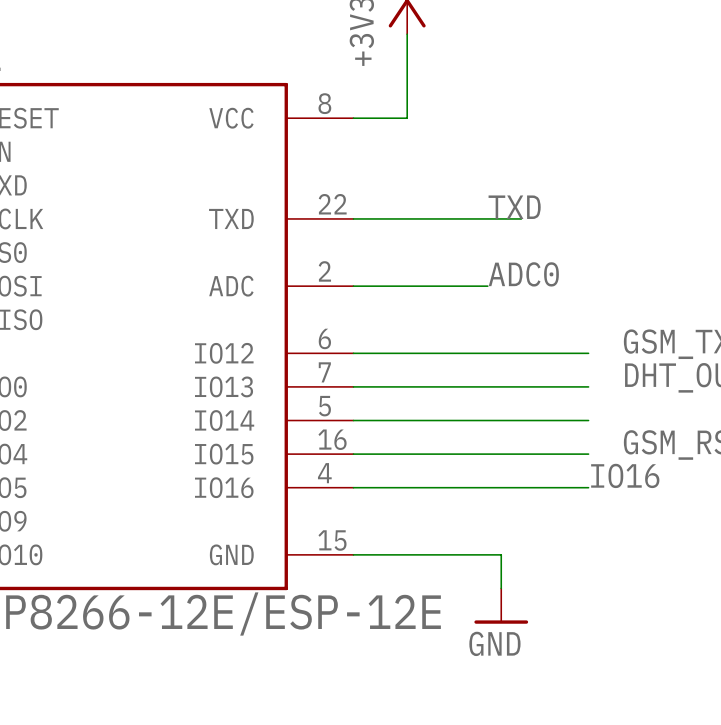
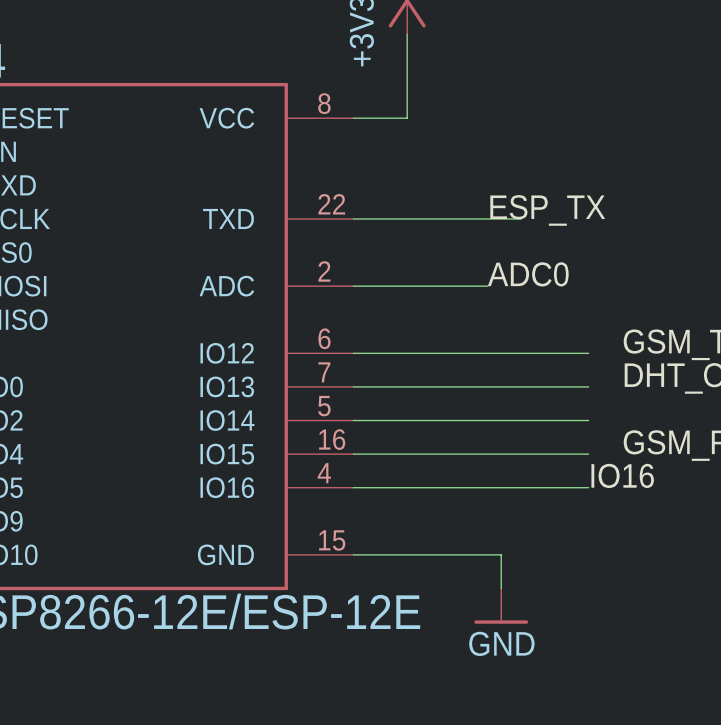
label: TXD (514, 207) -> ESP_TX (547, 210)

